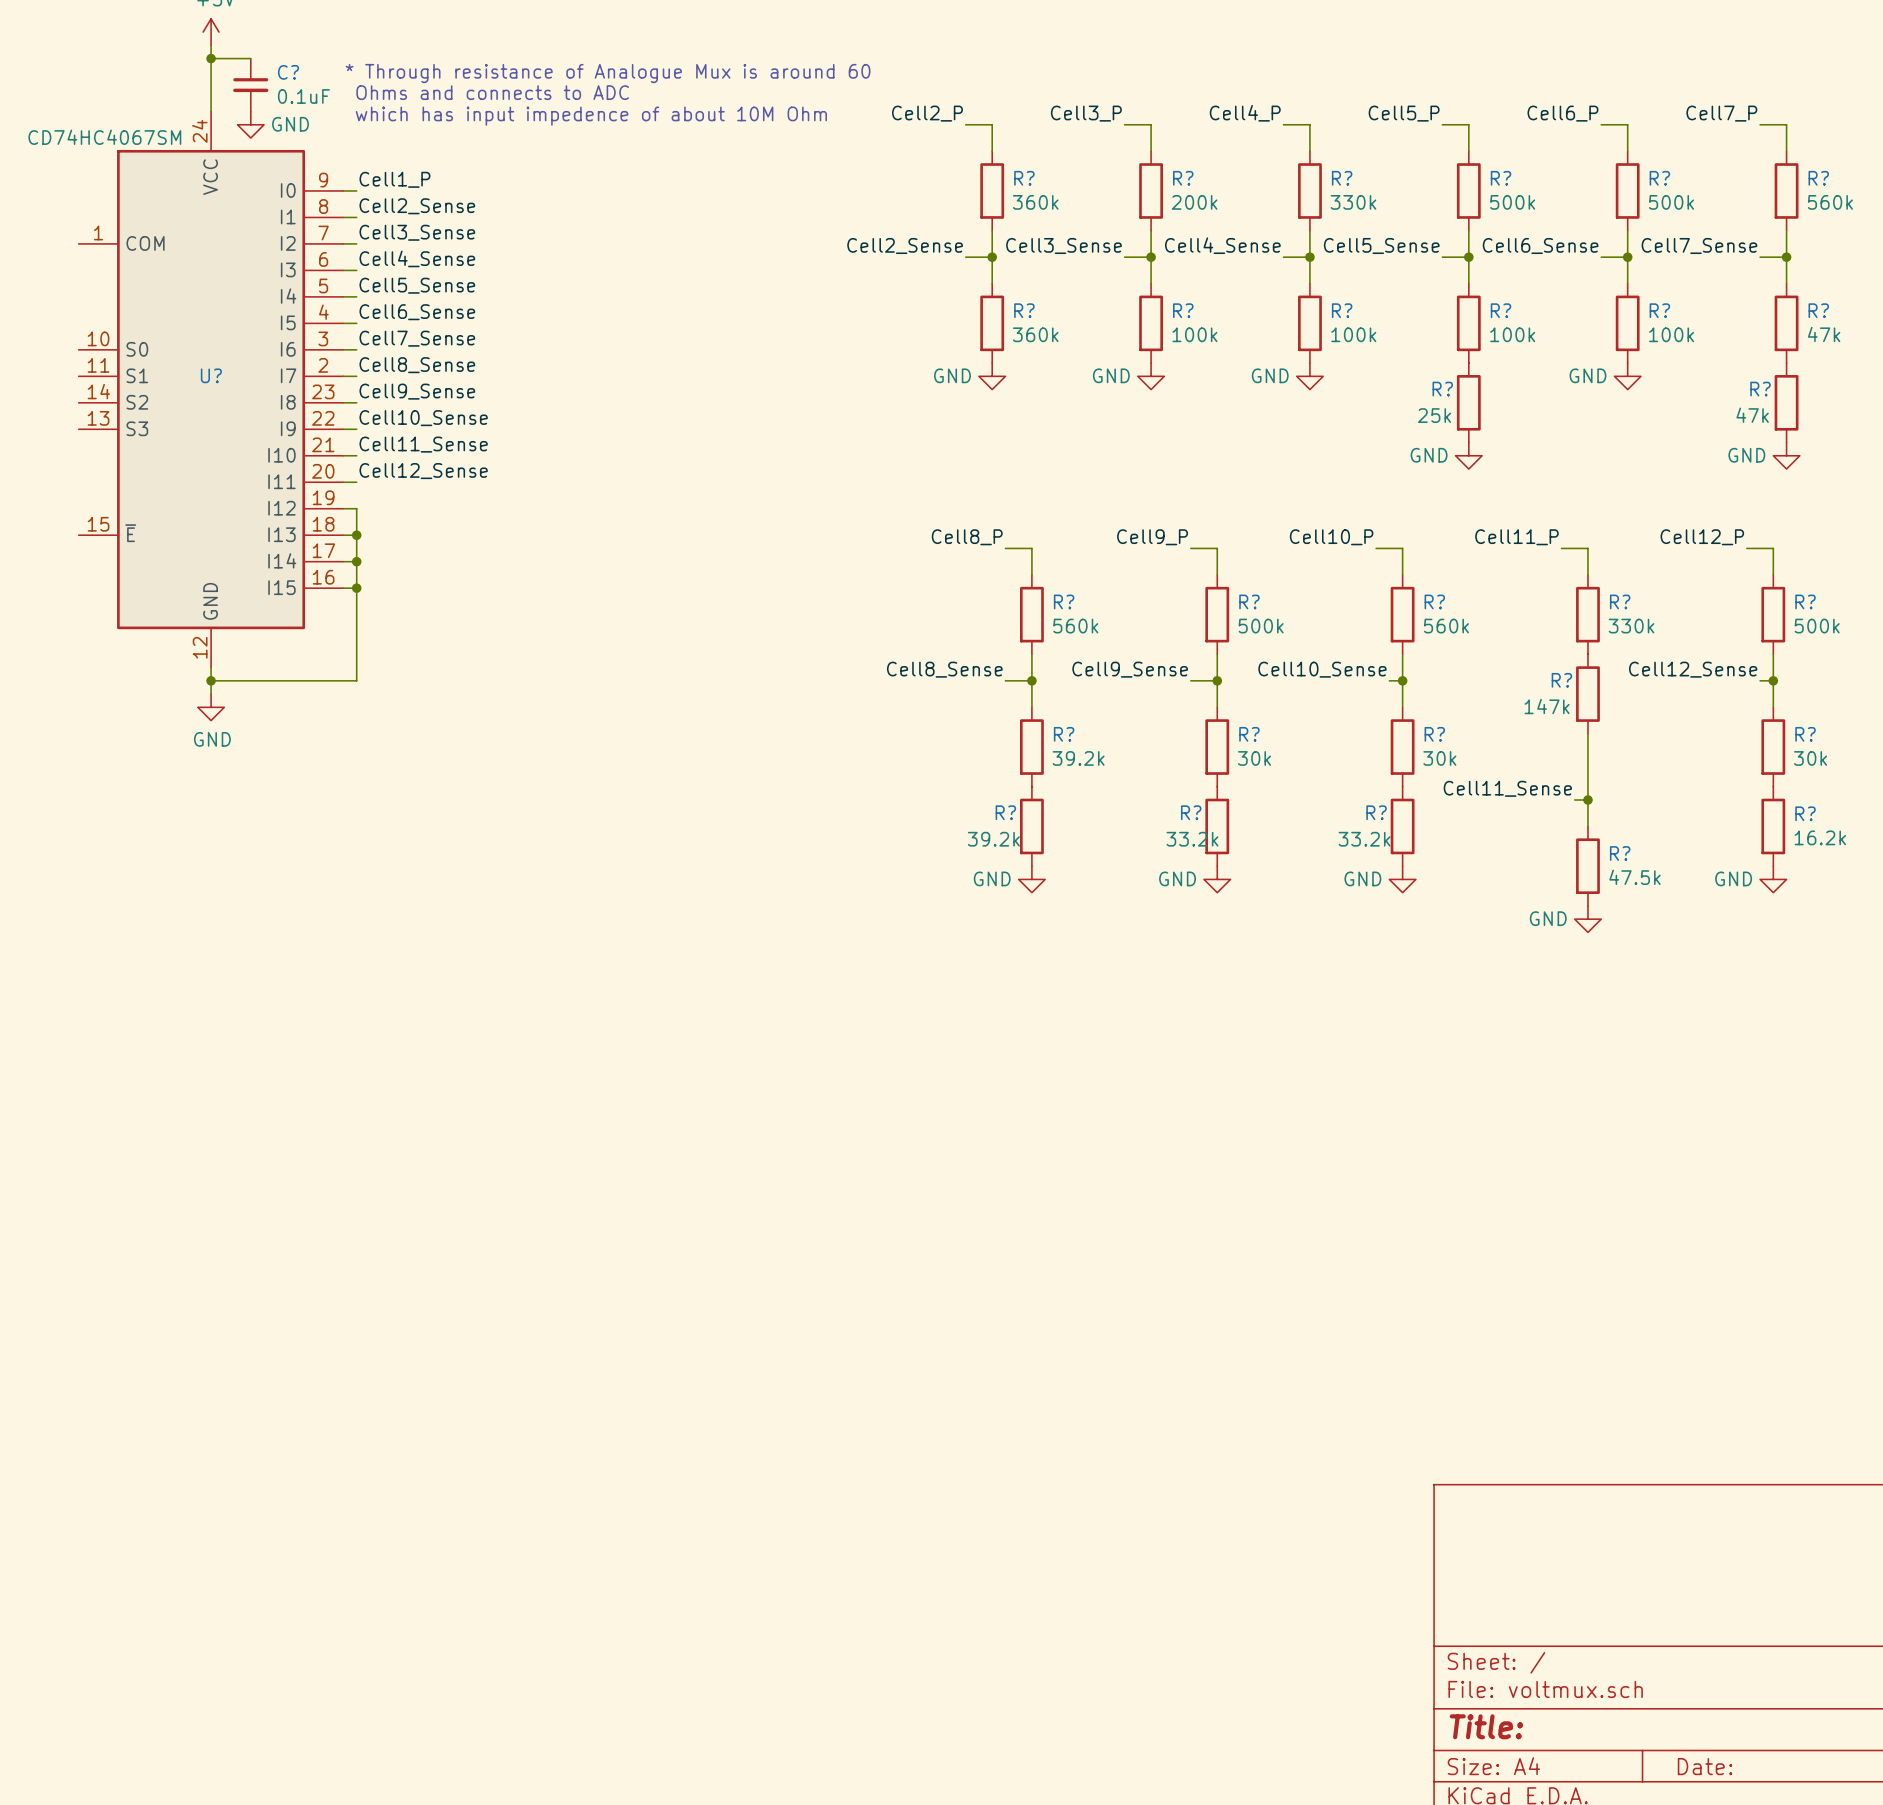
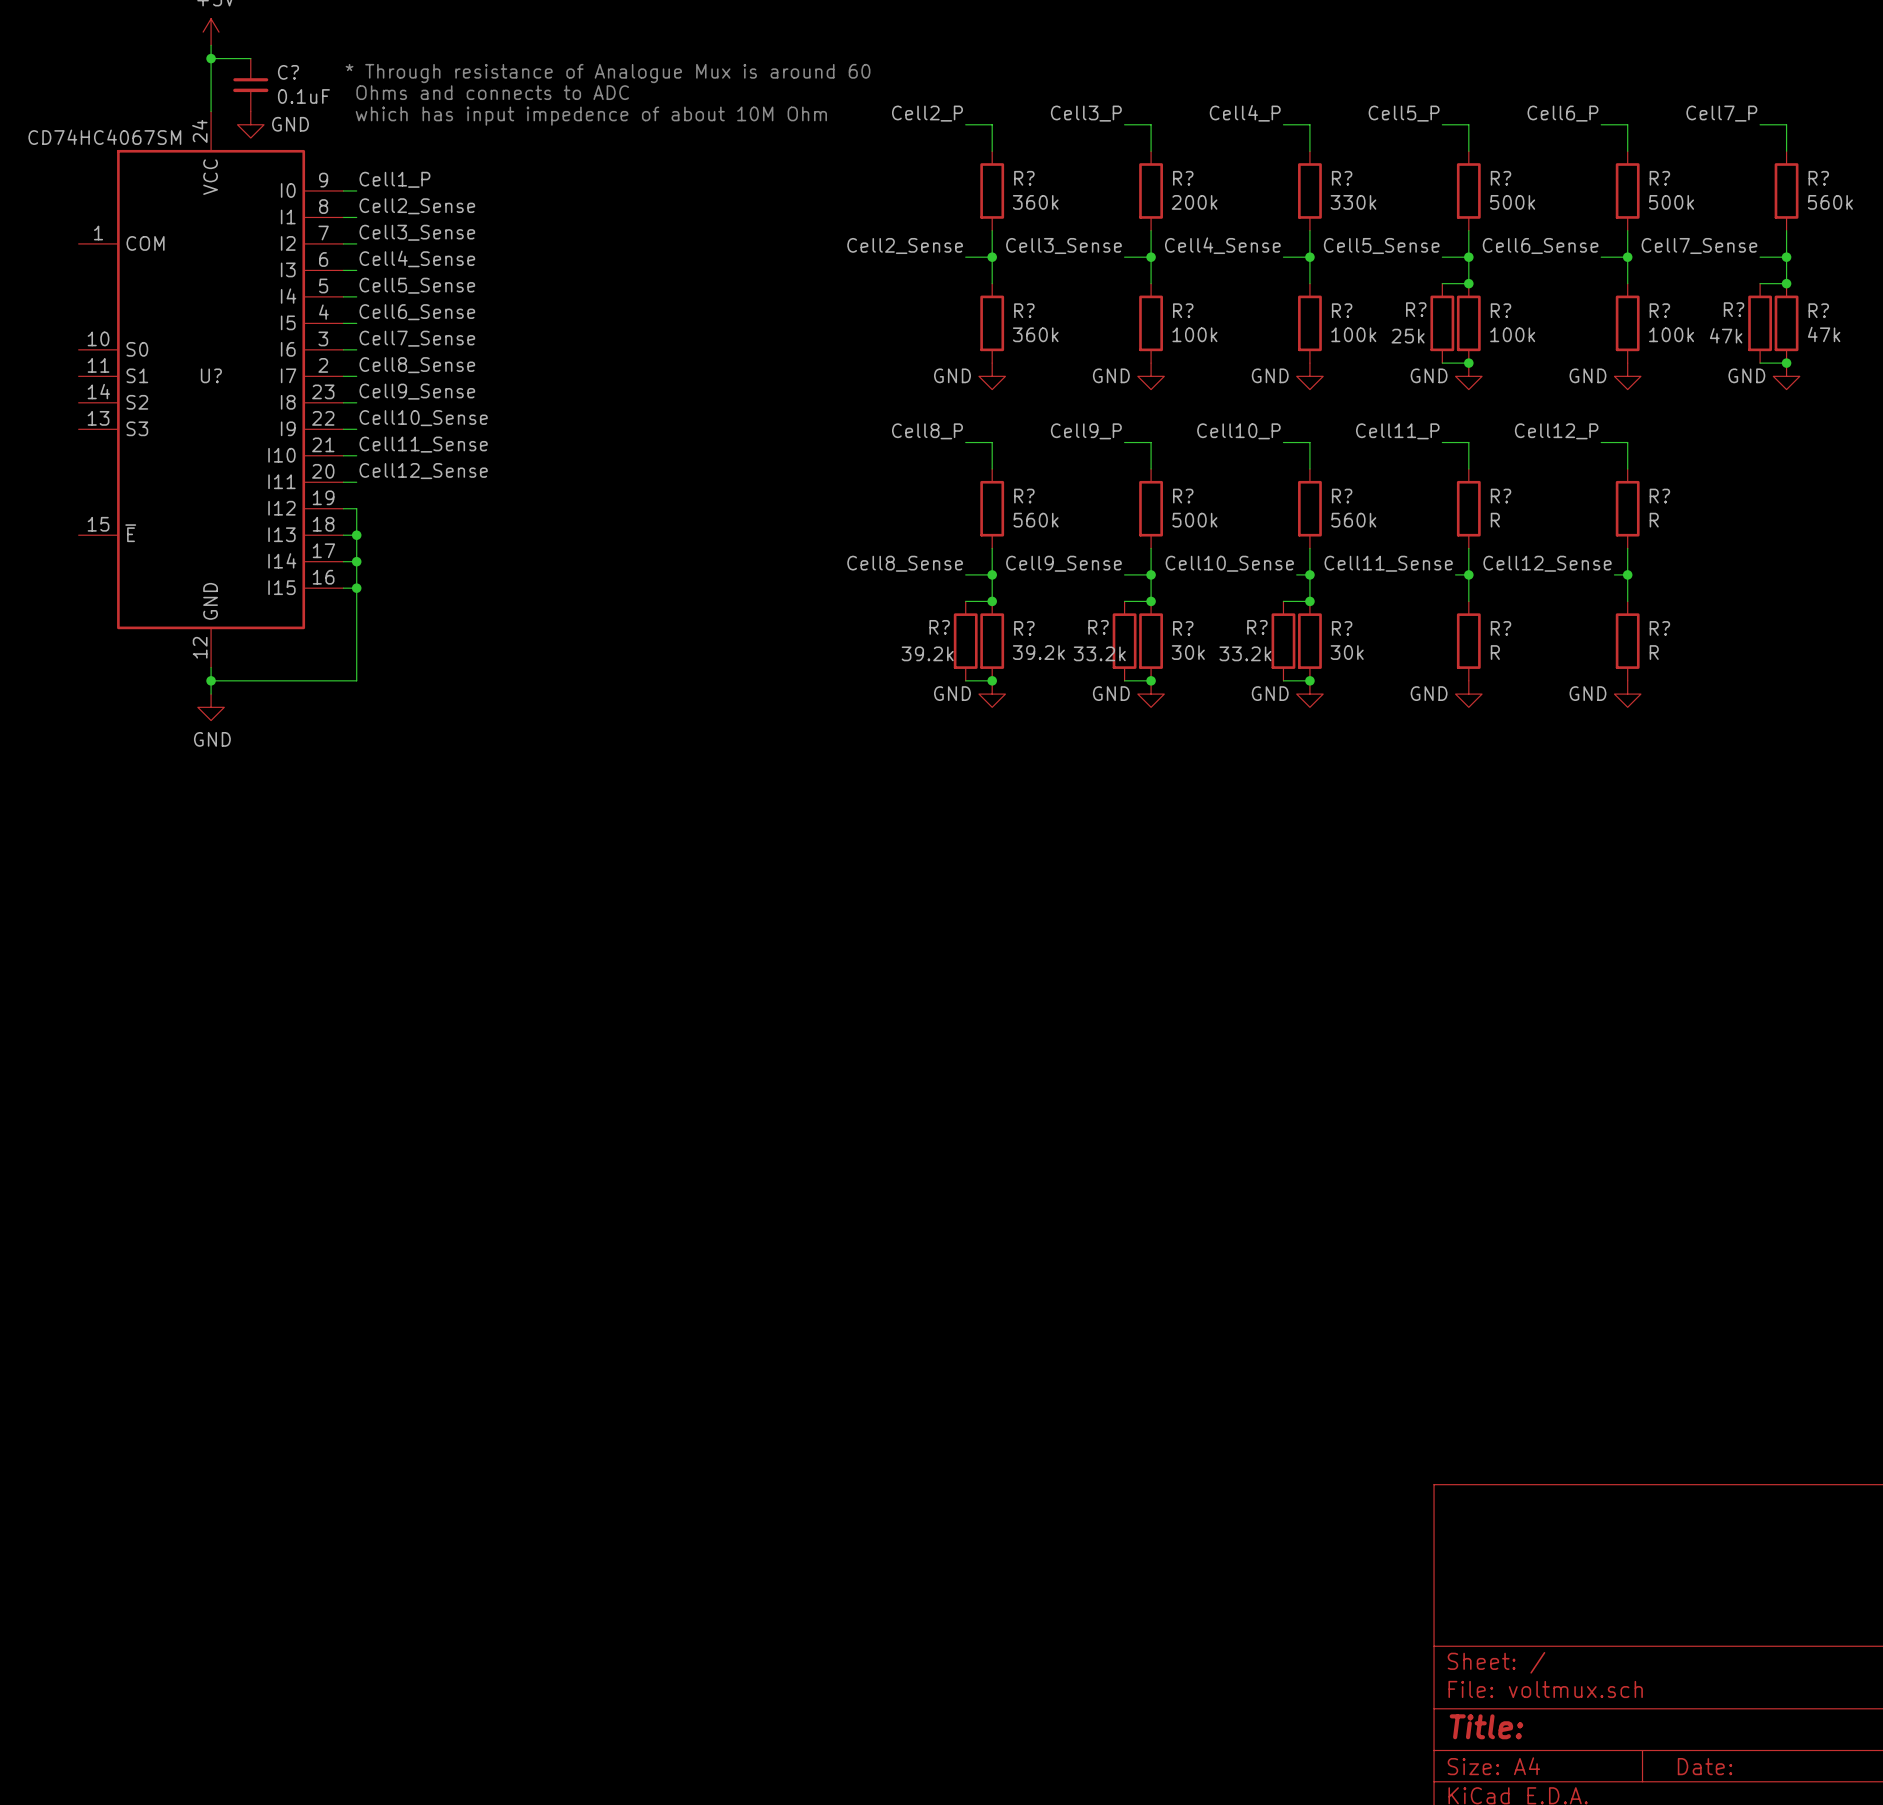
wire: none -> (1442, 283) (1468, 283)
junction: none -> (1468, 283)
wire: none -> (1760, 283) (1786, 283)
junction: none -> (1786, 283)
wire: none -> (1442, 363) (1468, 363)
junction: none -> (1468, 363)
wire: none -> (1760, 363) (1786, 363)
junction: none -> (1786, 363)
R? position: (1468, 402) -> (1442, 323)
R? position: (1786, 402) -> (1760, 323)
wire: none -> (1283, 442) (1309, 442) (1309, 469)
power symbol position: GND (1468, 455) -> GND (1468, 376)
power symbol position: GND (1786, 455) -> GND (1786, 376)
R?: none -> R (1468, 508)
R?: none -> R (1627, 508)
label position: Cell8_P (967, 537) -> Cell8_P (927, 431)
label position: Cell9_P (1152, 537) -> Cell9_P (1086, 431)
label position: Cell10_P (1331, 537) -> Cell10_P (1238, 431)
label position: Cell11_P (1516, 537) -> Cell11_P (1397, 431)
label position: Cell12_P (1702, 537) -> Cell12_P (1556, 431)
wire: none -> (992, 548) (992, 601) (965, 601)
wire: (1005, 548) (1031, 548) (1031, 574) -> (965, 442) (992, 442) (992, 469)
wire: none -> (1151, 548) (1151, 601) (1124, 601)
wire: (1190, 548) (1217, 548) (1217, 574) -> (1124, 442) (1151, 442) (1151, 469)
wire: none -> (1309, 548) (1309, 601) (1283, 601)
wire: (1376, 548) (1402, 548) (1402, 574) -> (1442, 442) (1468, 442) (1468, 469)
wire: (1561, 548) (1587, 548) (1587, 574) -> none
wire: (1746, 548) (1773, 548) (1773, 574) -> (1601, 442) (1627, 442) (1627, 469)
junction: none -> (992, 574)
junction: none -> (1151, 574)
wire: none -> (1296, 574) (1309, 574)
junction: none -> (1309, 574)
junction: none -> (1468, 574)
junction: none -> (1627, 574)
junction: none -> (992, 601)
junction: none -> (1151, 601)
junction: none -> (1309, 601)
R? position: (1031, 614) -> (992, 508)
R? position: (1217, 614) -> (1151, 508)
R? position: (1402, 614) -> (1309, 508)
R?: 330k (1587, 614) -> none
R?: 500k (1773, 614) -> none
R?: none -> 39.2k (965, 641)
R?: none -> 39.2k (992, 641)
R?: none -> 33.2k (1124, 641)
R?: none -> 30k (1151, 641)
R?: none -> 33.2k (1283, 641)
R?: none -> 30k (1309, 641)
R?: none -> R (1468, 641)
R?: none -> R (1627, 641)
wire: (1031, 654) (1031, 707) -> none
wire: (1217, 654) (1217, 707) -> none
wire: (1402, 654) (1402, 707) -> (1468, 548) (1468, 601)
wire: (1773, 654) (1773, 707) -> (1627, 548) (1627, 601)
label position: Cell8_Sense (944, 669) -> Cell8_Sense (905, 563)
label position: Cell9_Sense (1130, 669) -> Cell9_Sense (1063, 563)
label position: Cell10_Sense (1322, 669) -> Cell10_Sense (1229, 563)
label position: Cell12_Sense (1693, 669) -> Cell12_Sense (1547, 563)
wire: none -> (965, 680) (992, 680)
wire: (1005, 680) (1031, 680) -> (965, 574) (992, 574)
junction position: (1031, 680) -> (992, 680)
wire: none -> (1124, 680) (1151, 680)
junction: none -> (1151, 680)
wire: (1190, 680) (1217, 680) -> (1124, 574) (1151, 574)
junction: (1217, 680) -> none
wire: none -> (1283, 680) (1309, 680)
junction: none -> (1309, 680)
wire: (1389, 680) (1402, 680) -> (1455, 574) (1468, 574)
junction: (1402, 680) -> none
wire: (1760, 680) (1773, 680) -> (1614, 574) (1627, 574)
junction: (1773, 680) -> none
power symbol: none -> GND (992, 694)
power symbol: none -> GND (1151, 694)
power symbol: none -> GND (1309, 694)
power symbol: none -> GND (1468, 694)
R?: 147k (1587, 694) -> none
power symbol: none -> GND (1627, 694)
wire: (1587, 733) (1587, 826) -> none
R?: 39.2k (1031, 747) -> none
R?: 30k (1217, 747) -> none
R?: 30k (1402, 747) -> none
R?: 30k (1773, 747) -> none
label position: Cell11_Sense (1507, 788) -> Cell11_Sense (1388, 563)
wire: (1574, 800) (1587, 800) -> none
junction: (1587, 800) -> none
R?: 39.2k (1031, 826) -> none
R?: 33.2k (1217, 826) -> none
R?: 33.2k (1402, 826) -> none
R?: 16.2k (1773, 826) -> none
R?: 47.5k (1587, 866) -> none
power symbol: GND (1031, 879) -> none
power symbol: GND (1217, 879) -> none
power symbol: GND (1402, 879) -> none
power symbol: GND (1773, 879) -> none
power symbol: GND (1587, 919) -> none

